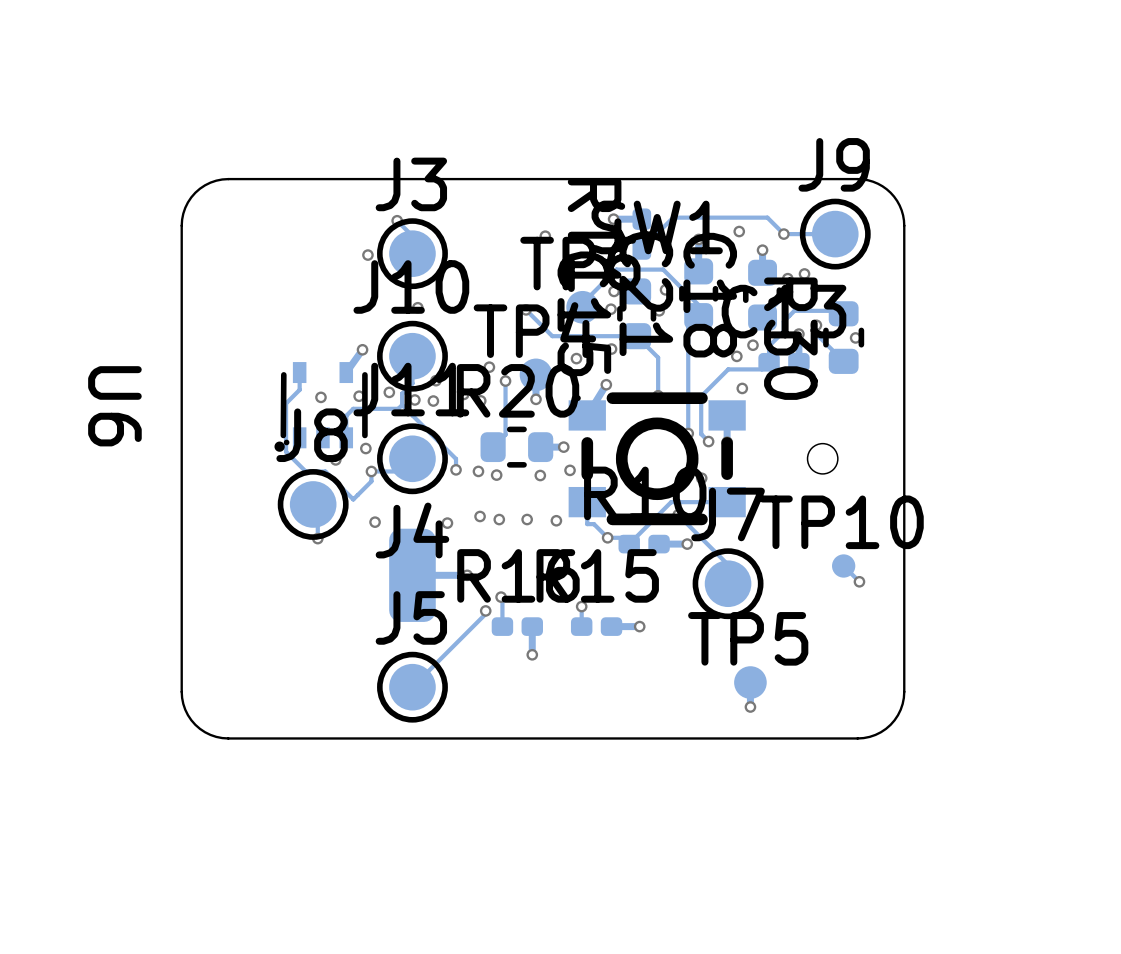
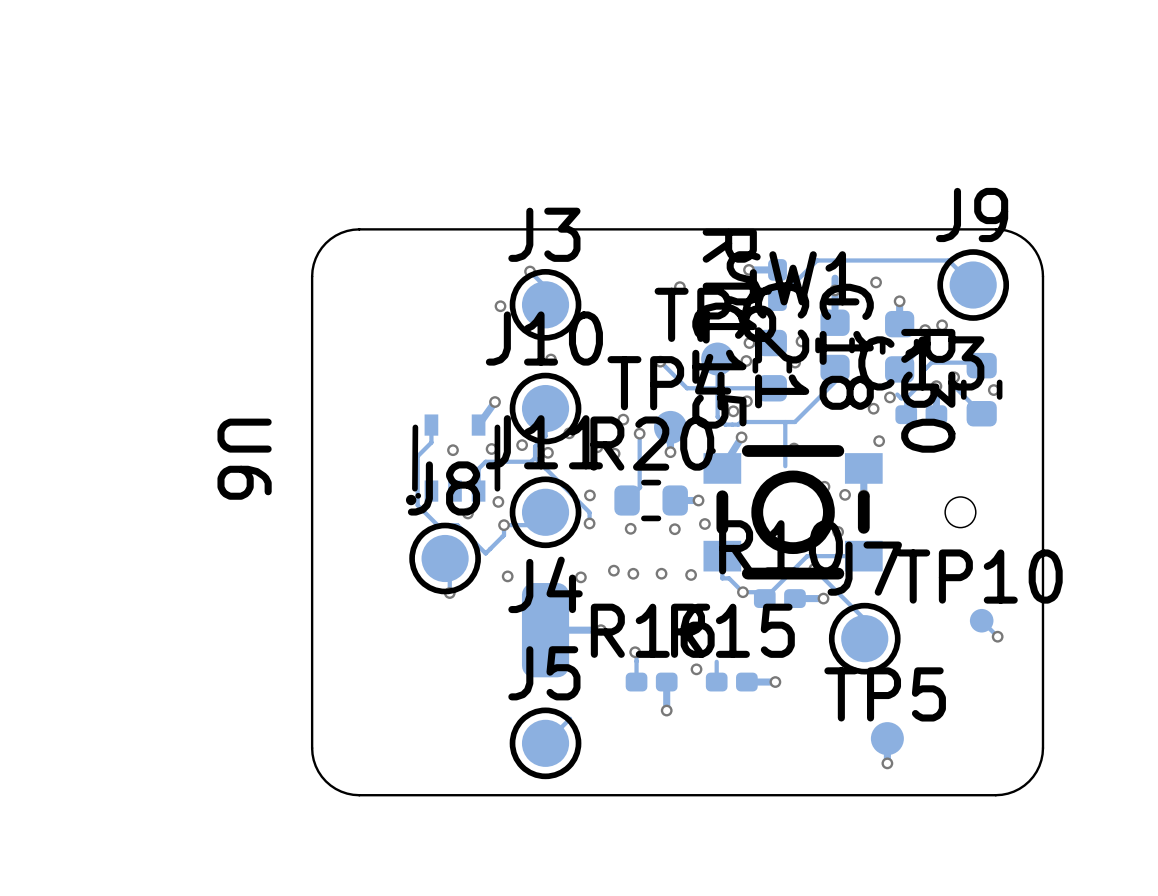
track: (673, 217) (767, 217) (783, 234) (835, 234) -> (809, 268) (817, 260) (948, 260) (973, 285)
track: none -> (835, 278) (835, 290)
via: (783, 234) -> none
track: (582, 307) (582, 303) (616, 269) (663, 269) (698, 305) (698, 316) (688, 326) (688, 433) -> (717, 359) (717, 416) (725, 424) (738, 424) (740, 422) (794, 422) (835, 381)
track: (636, 336) (658, 357) (658, 395) -> none
track: none -> (897, 394) (901, 398) (906, 398)
via position: (576, 358) -> (733, 411)
track: (769, 362) (761, 369) (728, 369) (701, 396) (701, 434) (708, 441) -> none
track: none -> (785, 422) (785, 466)
via: (433, 401) -> none
via: none -> (589, 495)
via: (478, 471) -> none
via position: (581, 606) -> (696, 669)
track: (485, 610) (485, 613) (436, 662) -> none
via: (485, 610) -> none

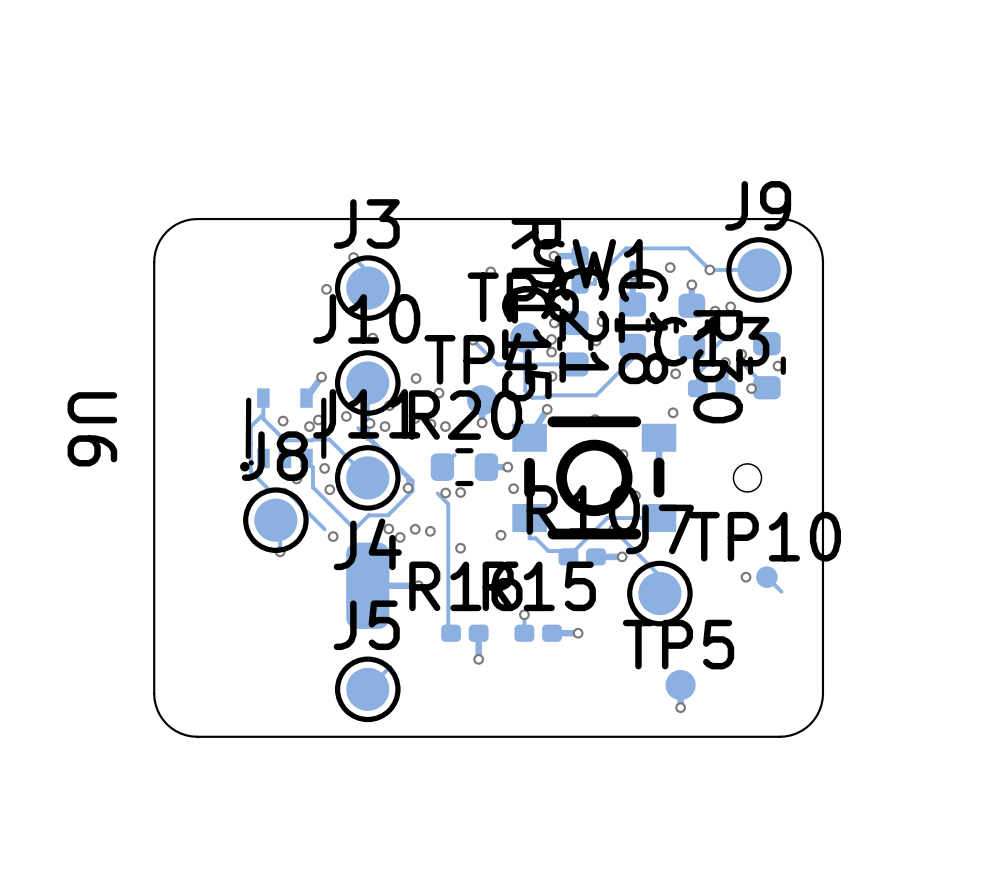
via: none -> (709, 269)
track: (973, 285) (948, 260) (817, 260) (777, 300) -> (759, 269) (709, 269) (688, 248) (626, 248) (594, 279) (594, 283) (580, 283)
track: (931, 362) (978, 362) (981, 365) -> none
track: (897, 394) (901, 398) (906, 398) -> none
via: (889, 397) -> none
via: none -> (675, 373)
via: none -> (416, 378)
via: (873, 408) -> none
via position: (733, 411) -> (551, 352)
via: none -> (751, 388)
track: (785, 422) (785, 466) -> none
track: (639, 433) (639, 487) -> none
via position: (639, 433) -> (445, 426)
track: (545, 436) (535, 446) (535, 457) (531, 461) (485, 461) (478, 468) (478, 491) -> (367, 408) (367, 439) (370, 439) (412, 480) (412, 490) (388, 515) (368, 515) (354, 529) (312, 487) (312, 467) (306, 458)
track: none -> (263, 414) (263, 418) (284, 440) (329, 439) (367, 477)
via: none -> (309, 426)
via: none -> (385, 426)
via: (845, 494) -> none
via: (589, 495) -> none
track: (545, 512) (532, 525) (504, 525) (504, 535) (485, 553) (457, 525) (455, 525) -> (324, 529) (285, 489)
via: none -> (460, 492)
via: (674, 529) -> none
via: none -> (388, 528)
via: none -> (415, 529)
via: (633, 573) -> none
via: (661, 573) -> none
via: none -> (460, 548)
via: (742, 592) -> none
via position: (997, 636) -> (746, 577)
track: (635, 652) (636, 682) -> (437, 493) (448, 504) (448, 630) (451, 633)
via: (635, 652) -> none
via position: (696, 669) -> (524, 614)

